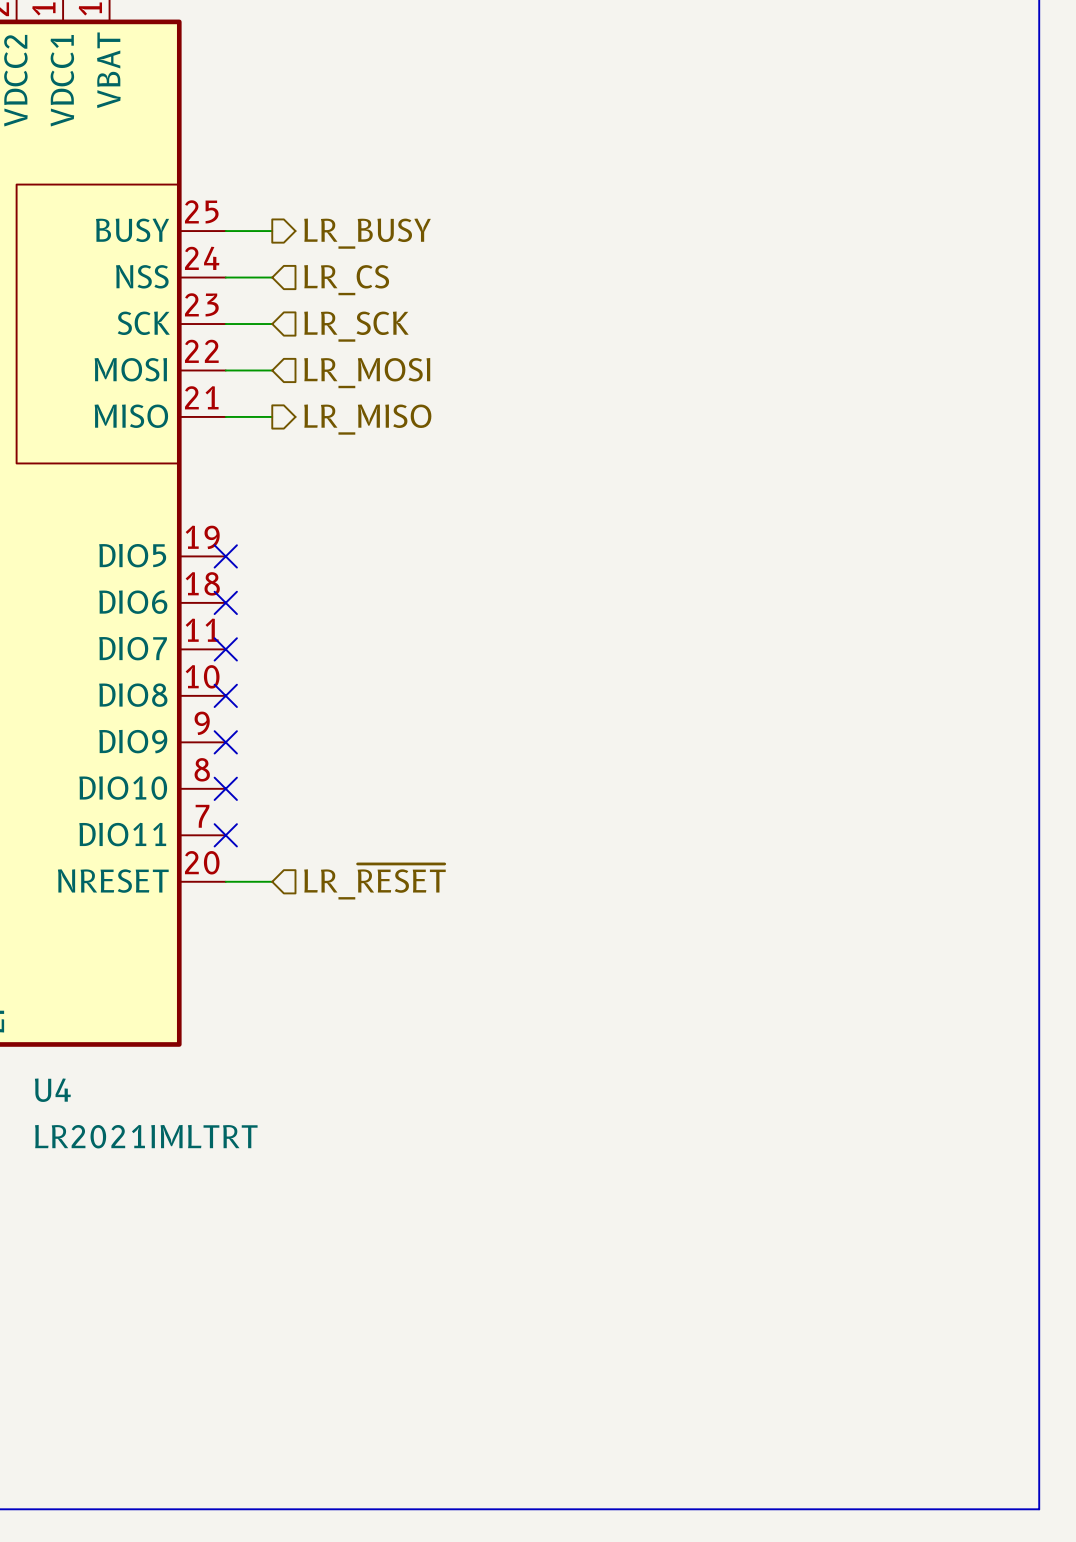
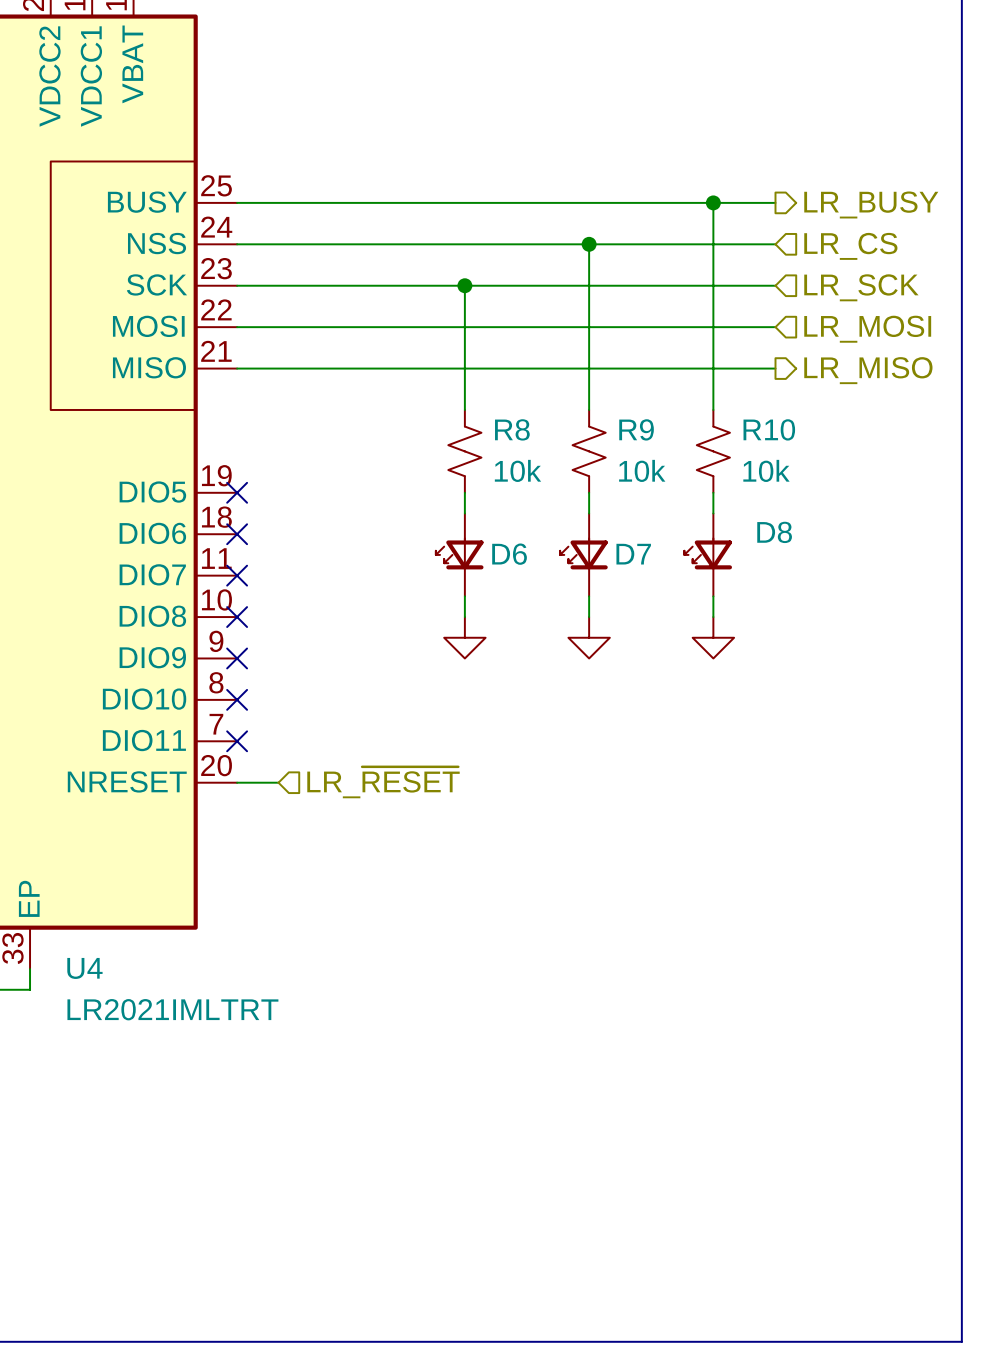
wire: none -> (278, 202) (775, 202)
wire: none -> (713, 202) (713, 409)
junction: none -> (713, 202)
hierarchical label: LR_BUSY (367, 233) -> none
hierarchical label: none -> LR_BUSY (871, 204)
wire: none -> (278, 244) (775, 244)
wire: none -> (589, 244) (589, 409)
junction: none -> (589, 244)
hierarchical label: LR_CS (346, 280) -> none
hierarchical label: none -> LR_CS (850, 246)
wire: none -> (278, 285) (775, 285)
wire: none -> (464, 285) (464, 409)
junction: none -> (464, 285)
hierarchical label: LR_SCK (356, 326) -> none
hierarchical label: none -> LR_SCK (861, 287)
wire: none -> (278, 327) (775, 327)
hierarchical label: LR_MOSI (367, 373) -> none
hierarchical label: none -> LR_MOSI (867, 329)
wire: none -> (278, 368) (775, 368)
hierarchical label: LR_MISO (367, 419) -> none
hierarchical label: none -> LR_MISO (868, 370)
R8: none -> 10k (464, 451)
R9: none -> 10k (589, 451)
R10: none -> 10k (713, 451)
wire: none -> (464, 492) (464, 513)
wire: none -> (589, 492) (589, 513)
wire: none -> (713, 492) (713, 513)
D6: none -> (459, 554)
D7: none -> (583, 554)
D8: none -> (708, 554)
wire: none -> (464, 596) (464, 617)
wire: none -> (589, 596) (589, 617)
wire: none -> (713, 596) (713, 617)
power symbol: none -> (464, 637)
power symbol: none -> (589, 637)
power symbol: none -> (713, 637)

